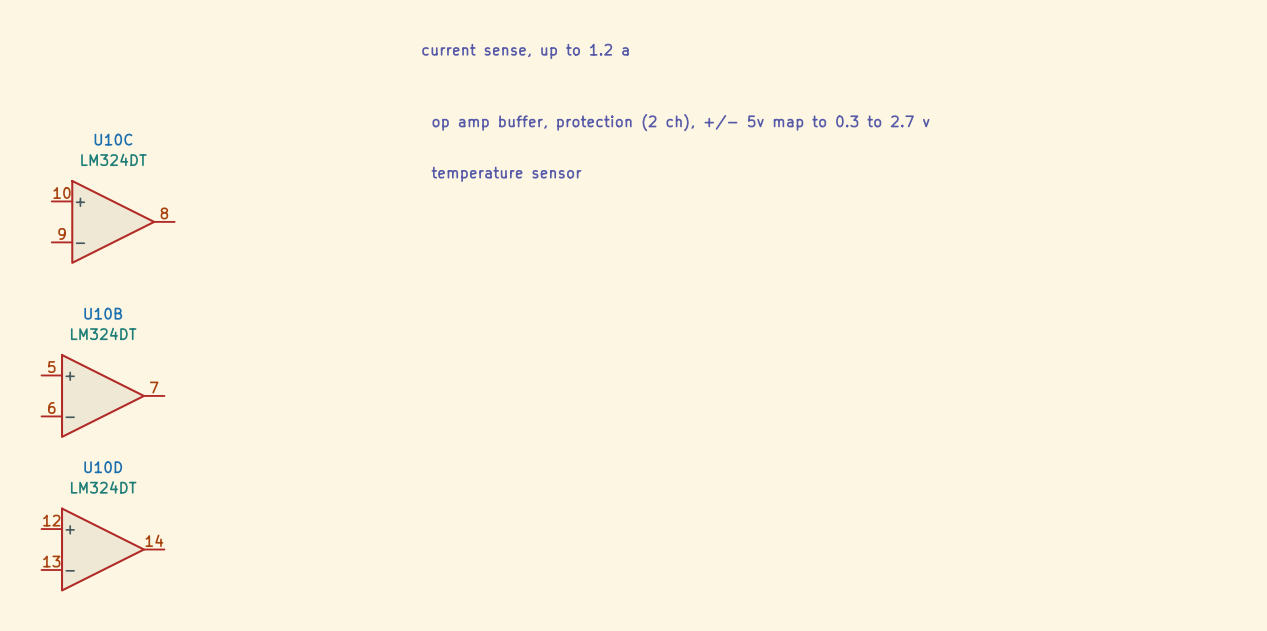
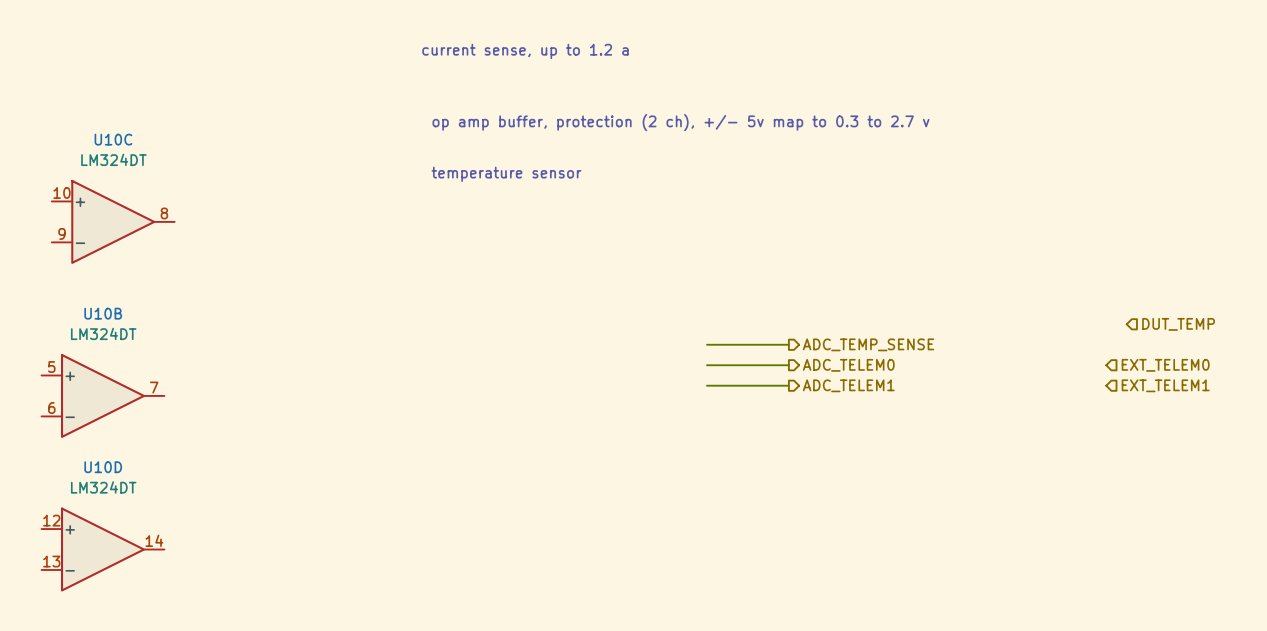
hierarchical label: none -> DUT_TEMP (1178, 324)
wire: none -> (707, 344) (788, 344)
hierarchical label: none -> ADC_TEMP_SENSE (868, 344)
wire: none -> (707, 365) (788, 365)
hierarchical label: none -> ADC_TELEM0 (848, 365)
hierarchical label: none -> EXT_TELEM0 (1165, 365)
wire: none -> (707, 385) (788, 385)
hierarchical label: none -> ADC_TELEM1 (848, 385)
hierarchical label: none -> EXT_TELEM1 (1165, 385)

